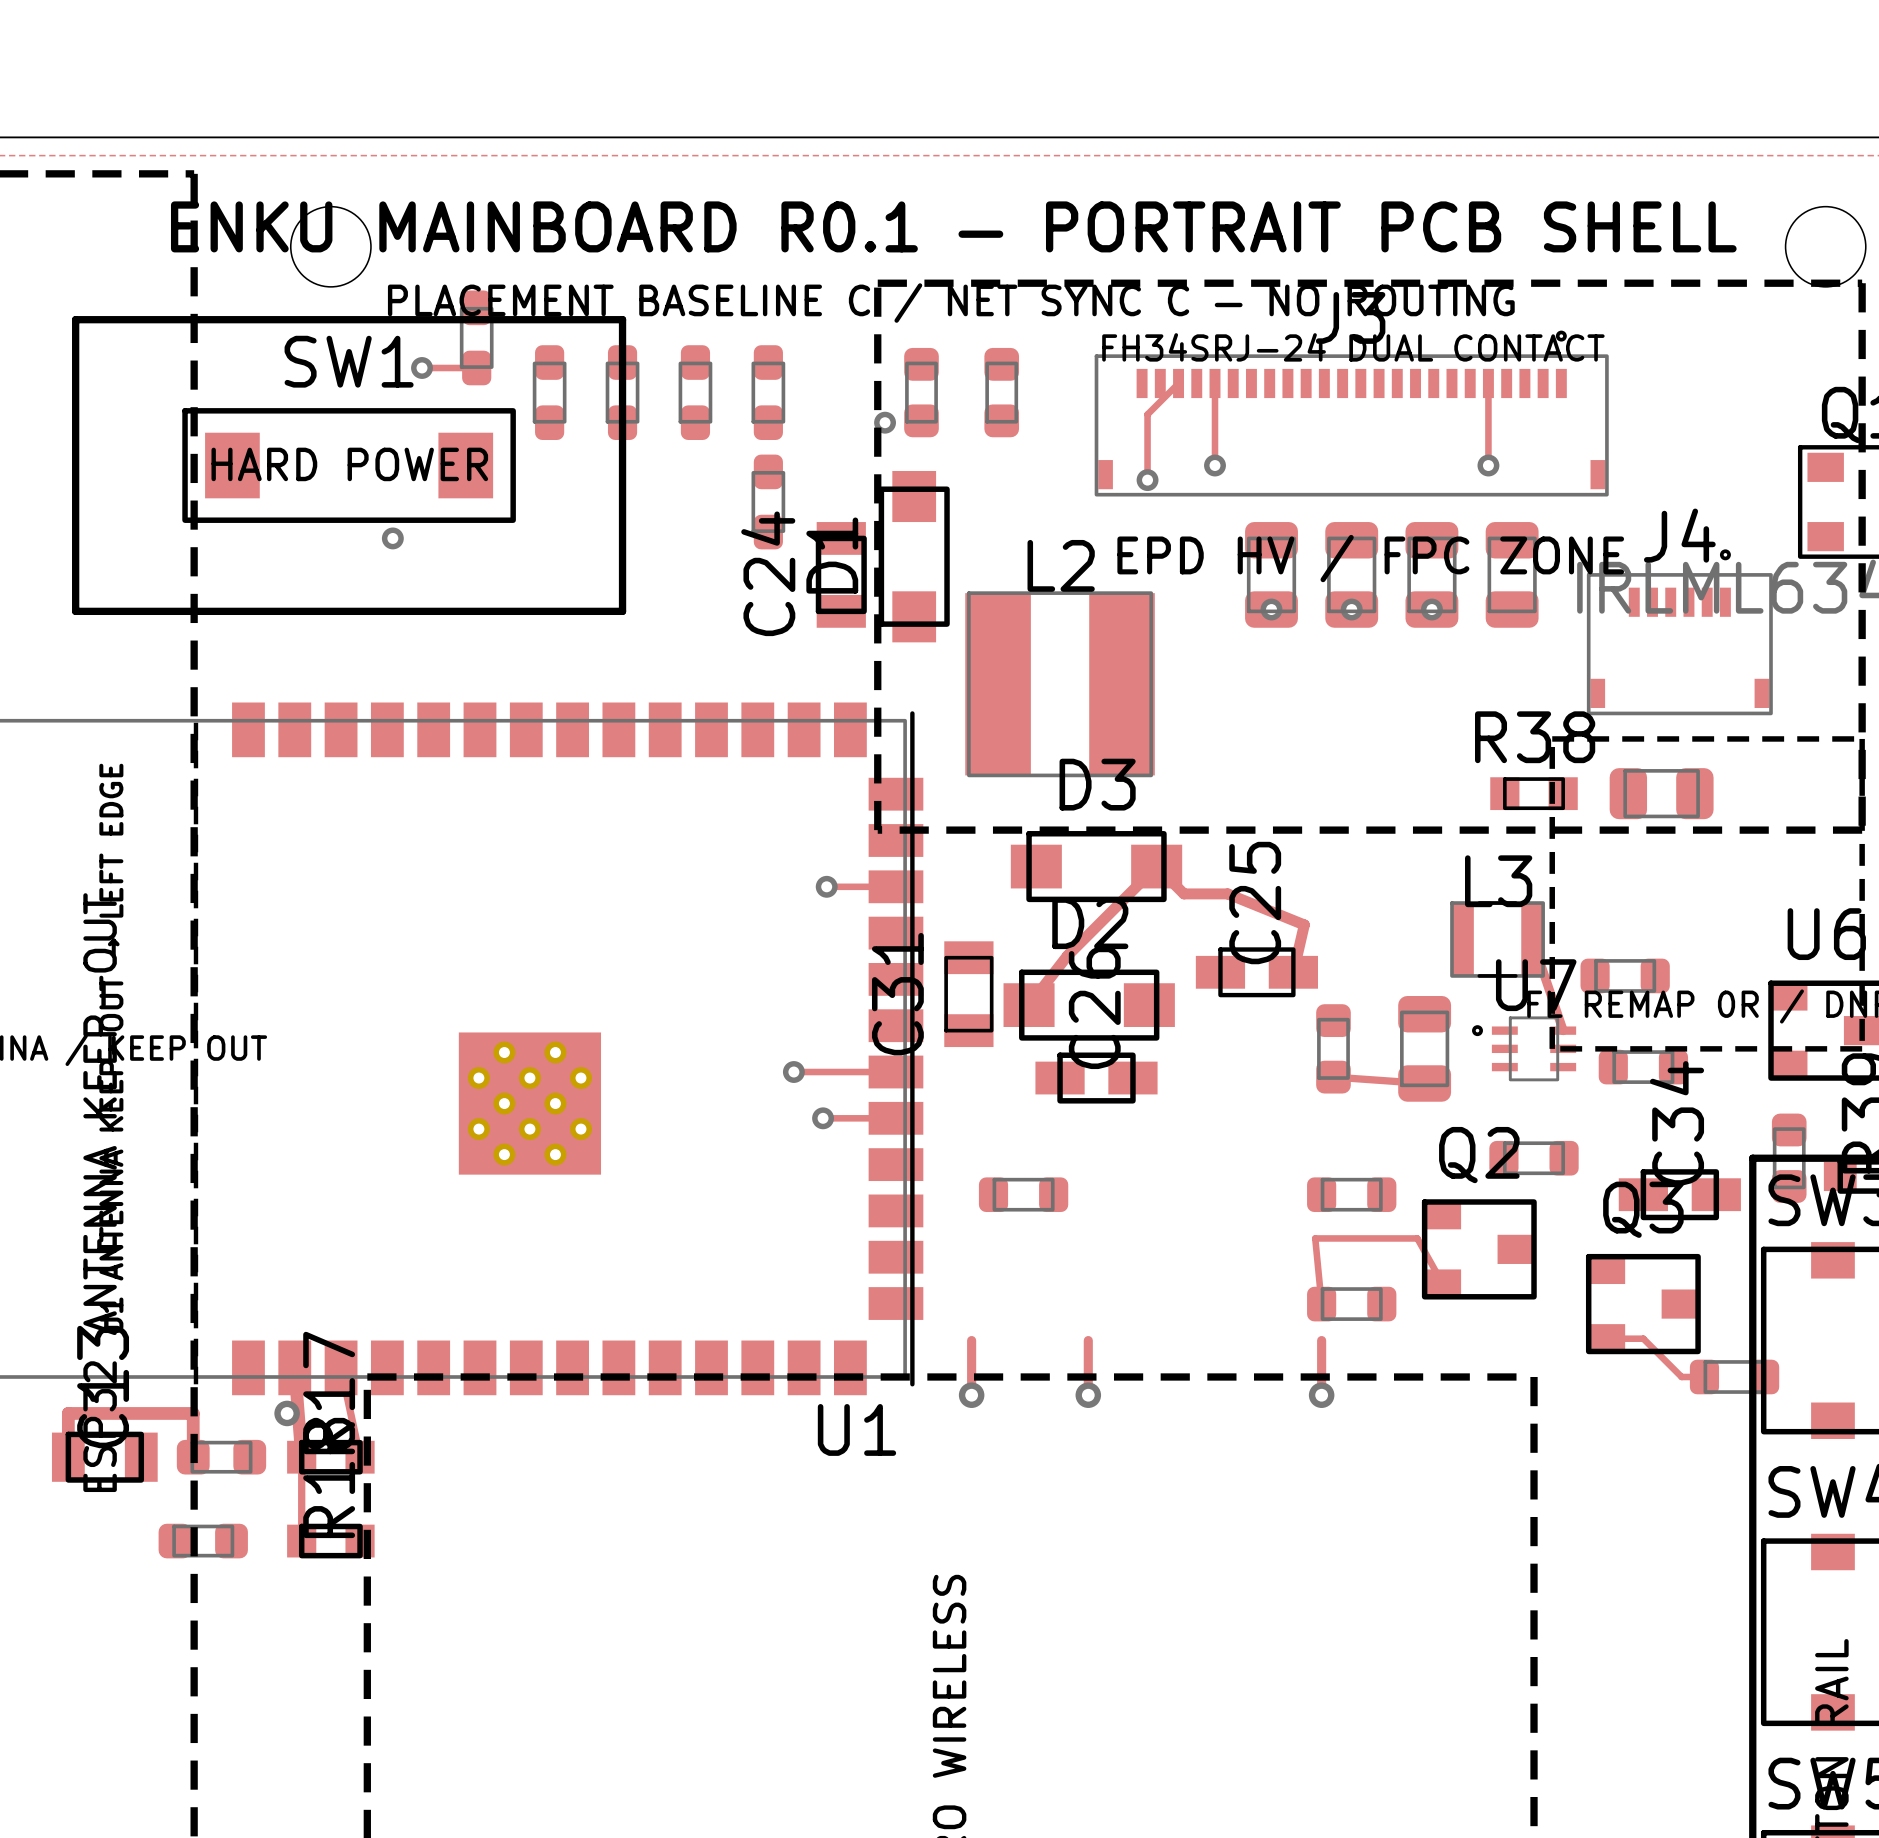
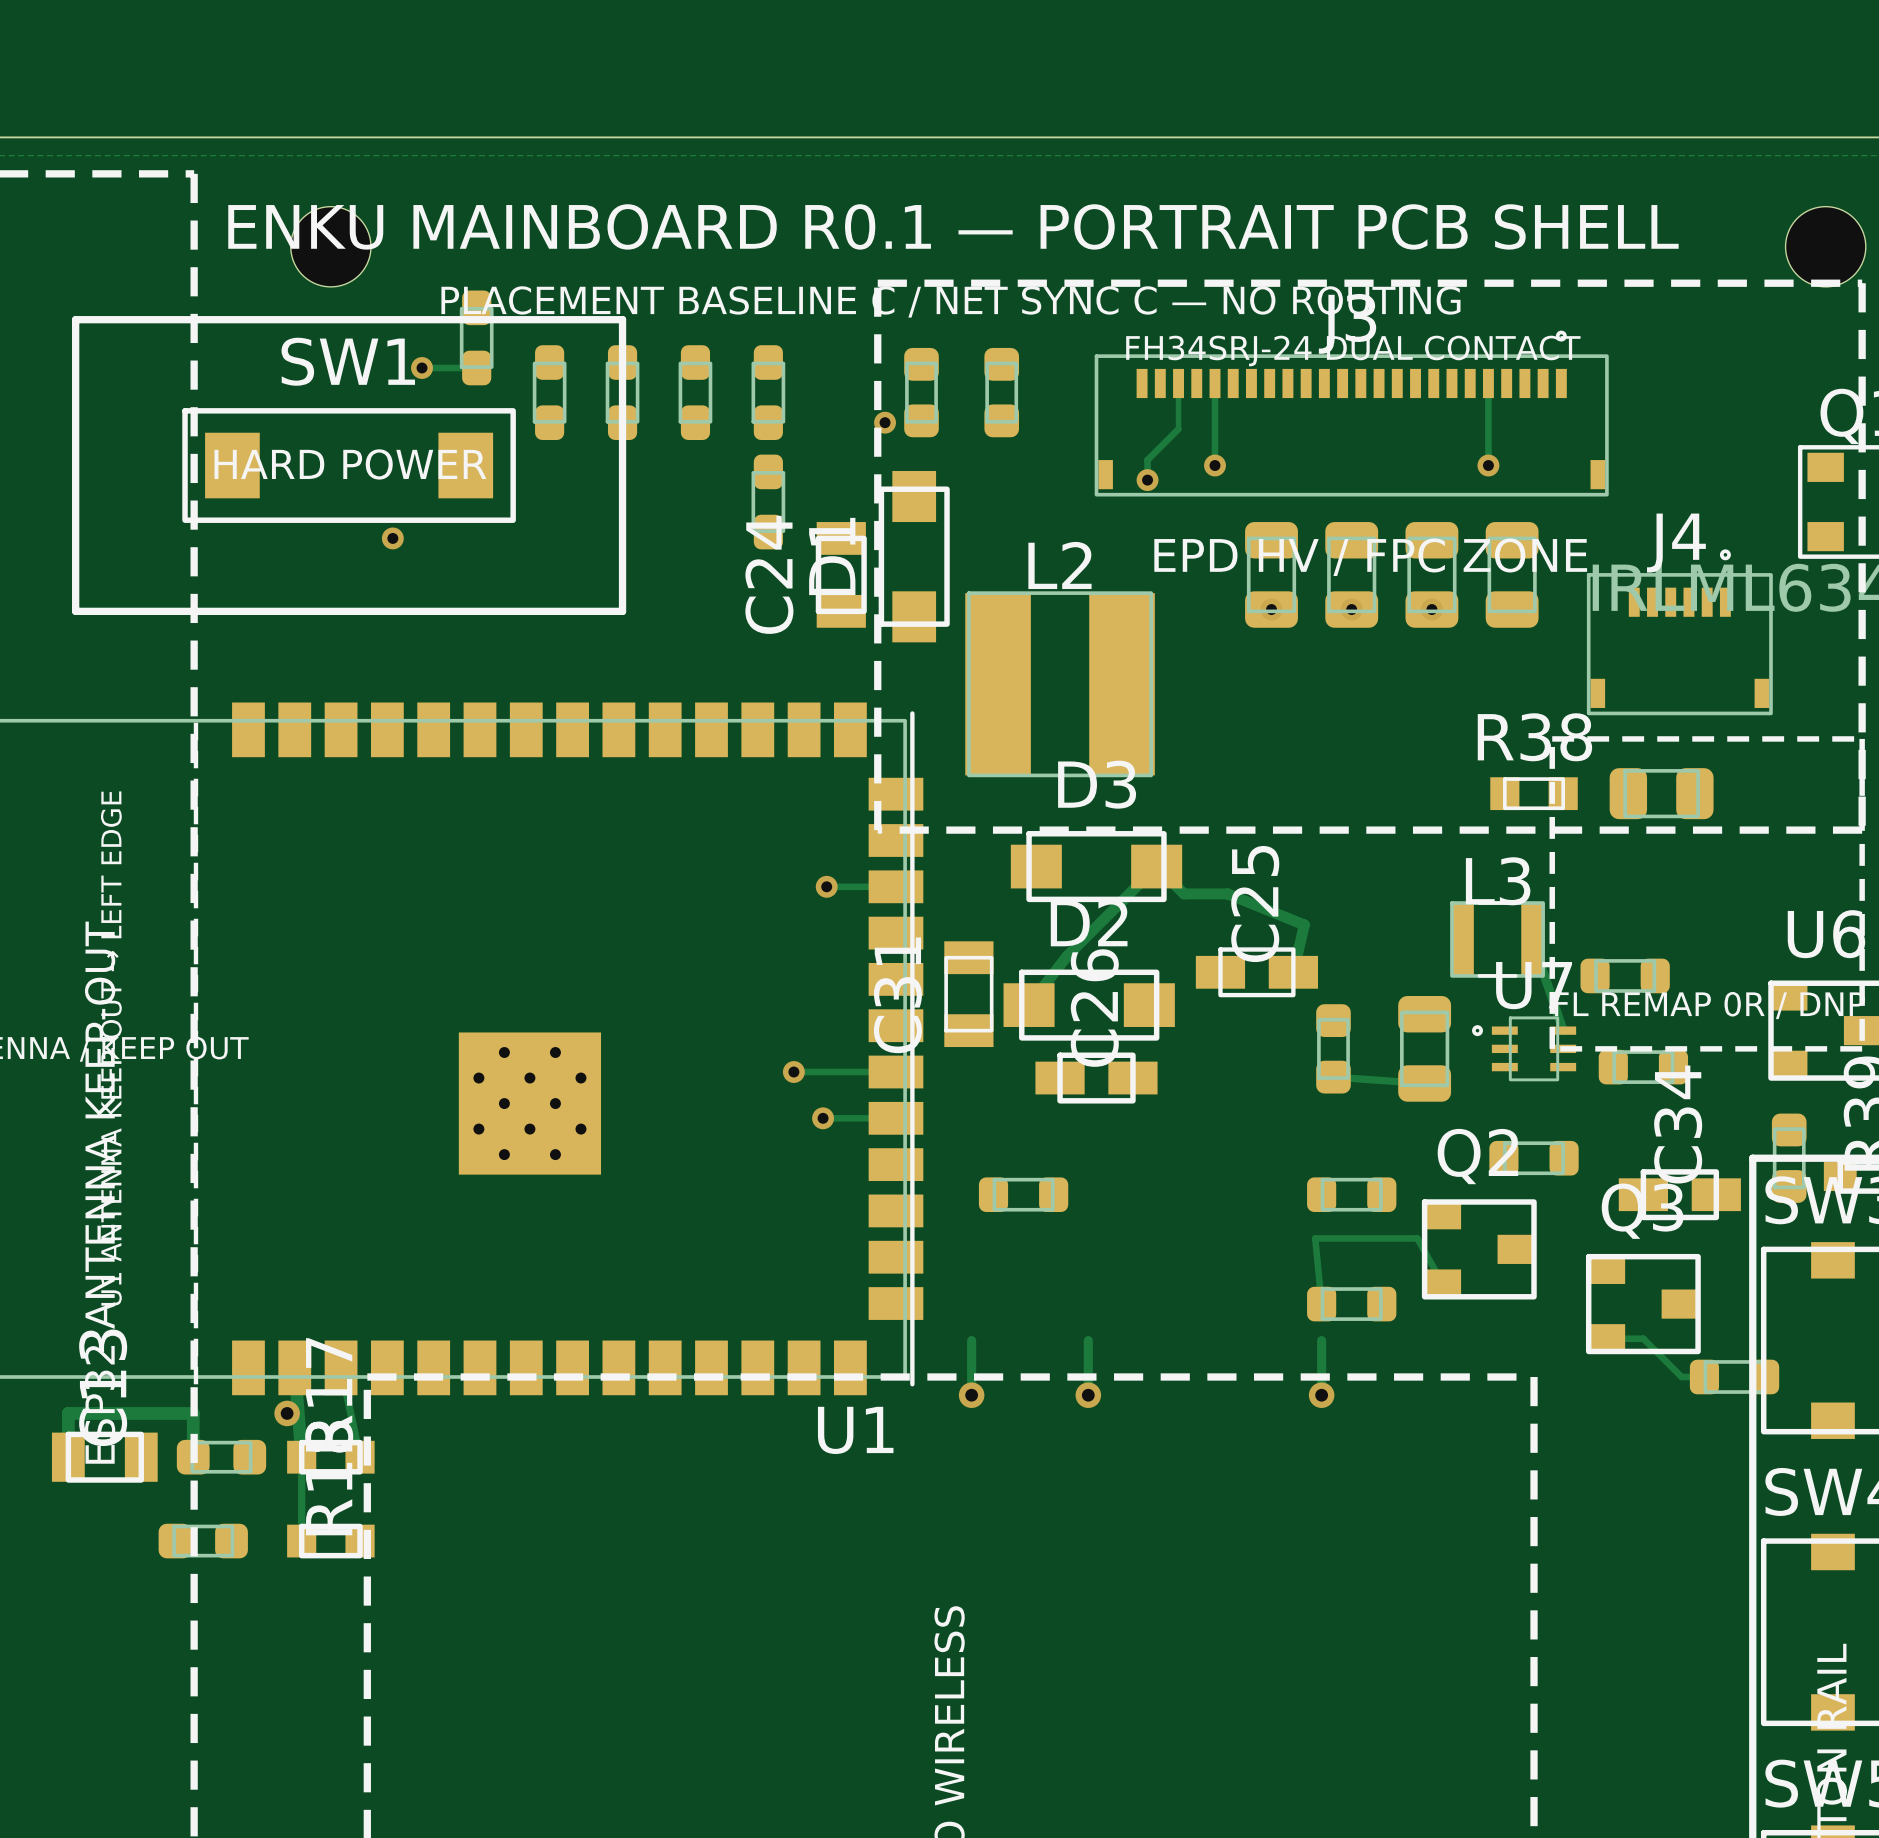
track: (1178, 383) (1147, 414) (1147, 460) -> (1178, 383) (1178, 429) (1147, 460)

